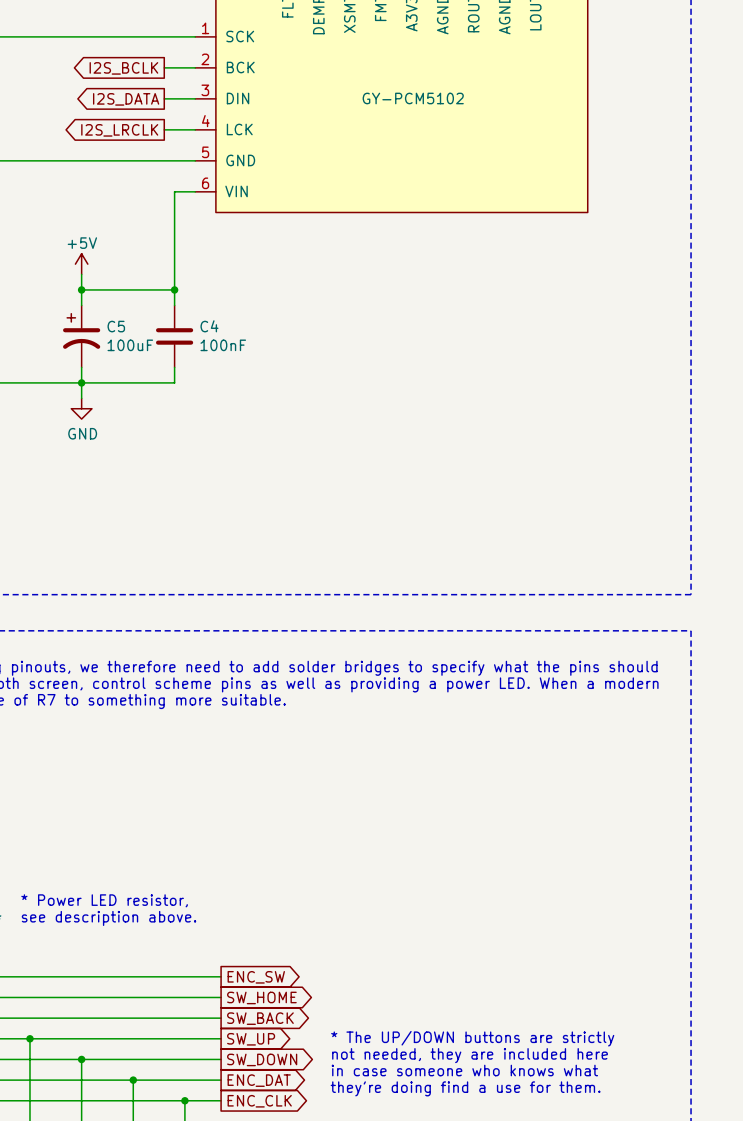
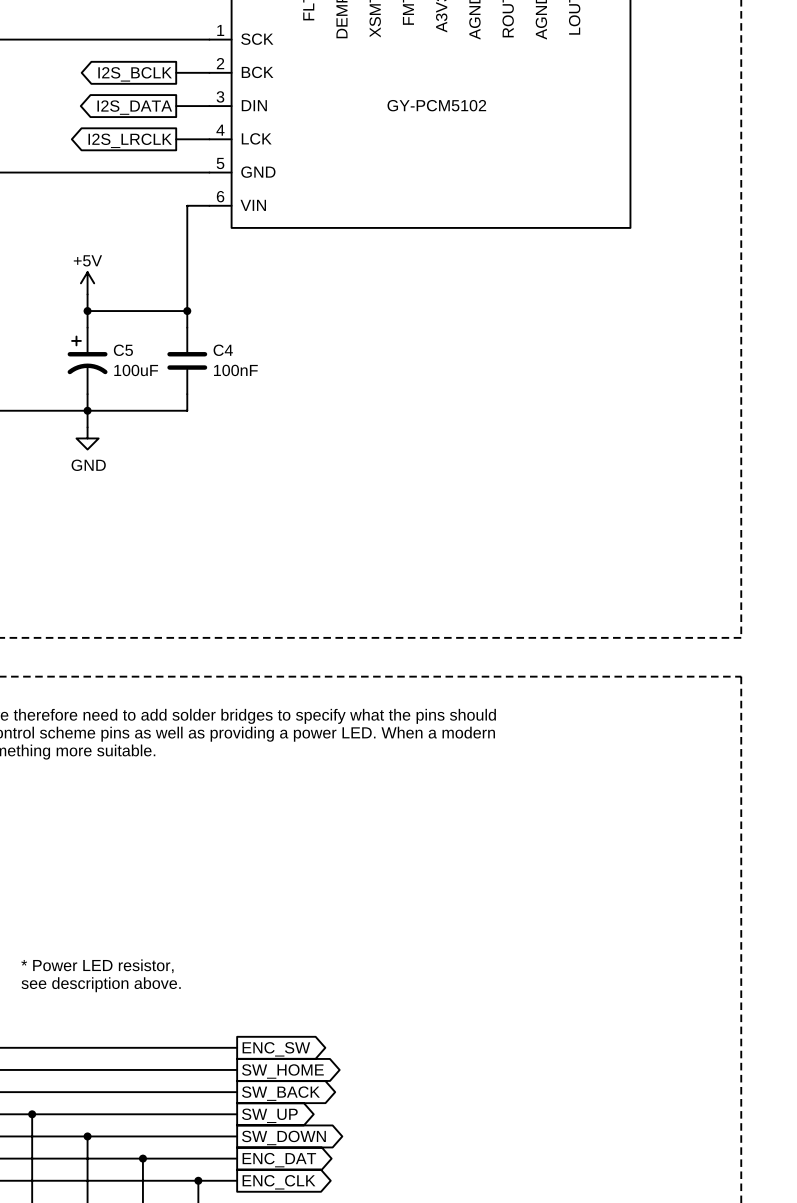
text: * The UP/DOWN buttons are strictly (472, 1038) -> none
text: not needed, they are included here (470, 1055) -> none
text: in case someone who knows what (464, 1070) -> none
text: they're doing find a use for them. (465, 1088) -> none

